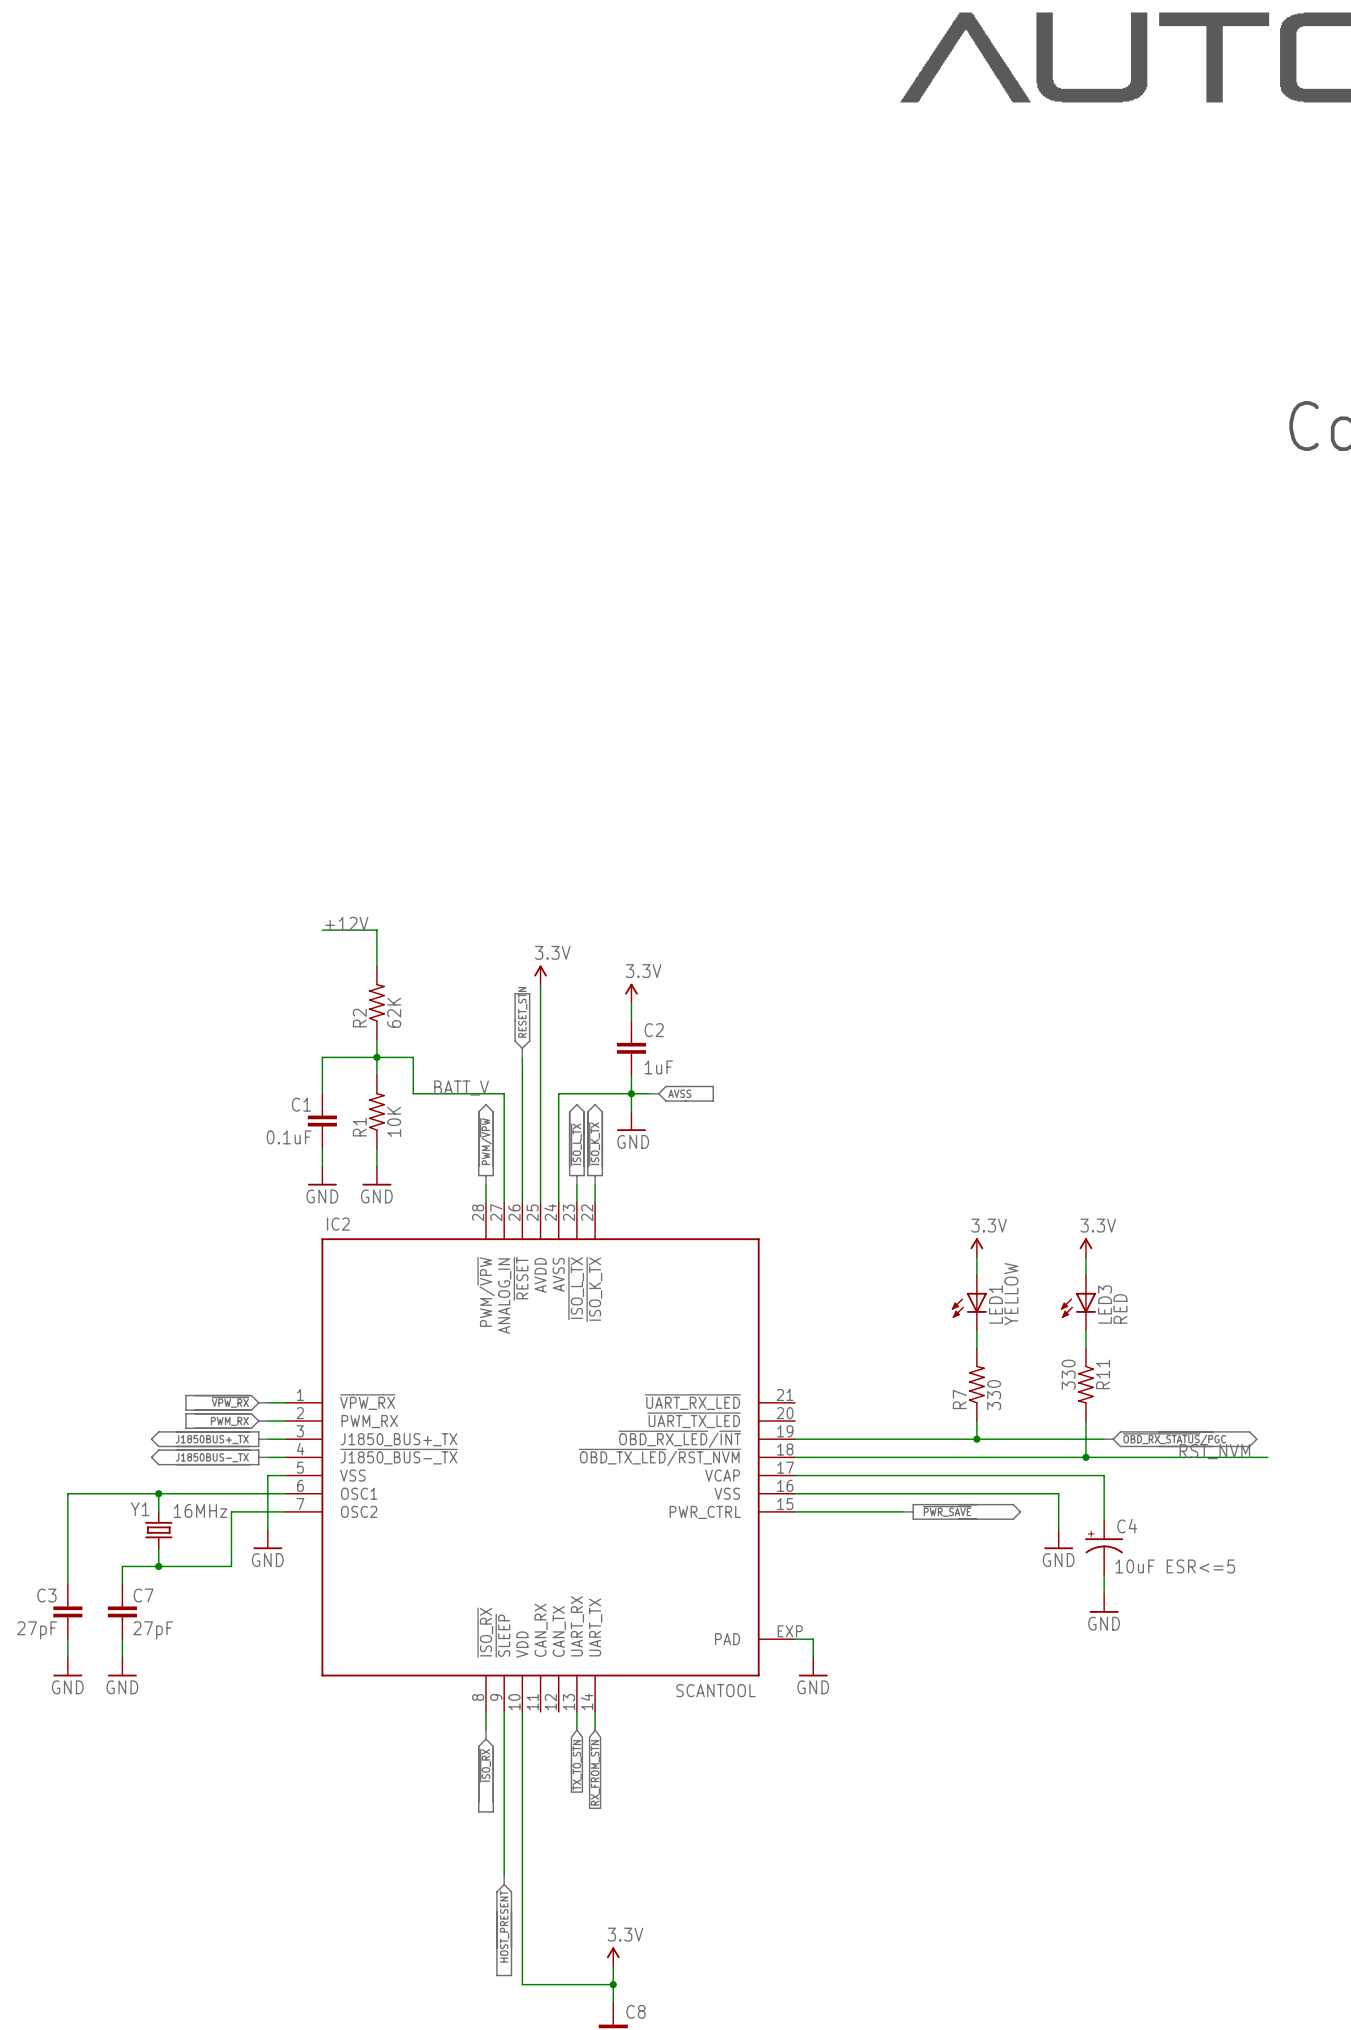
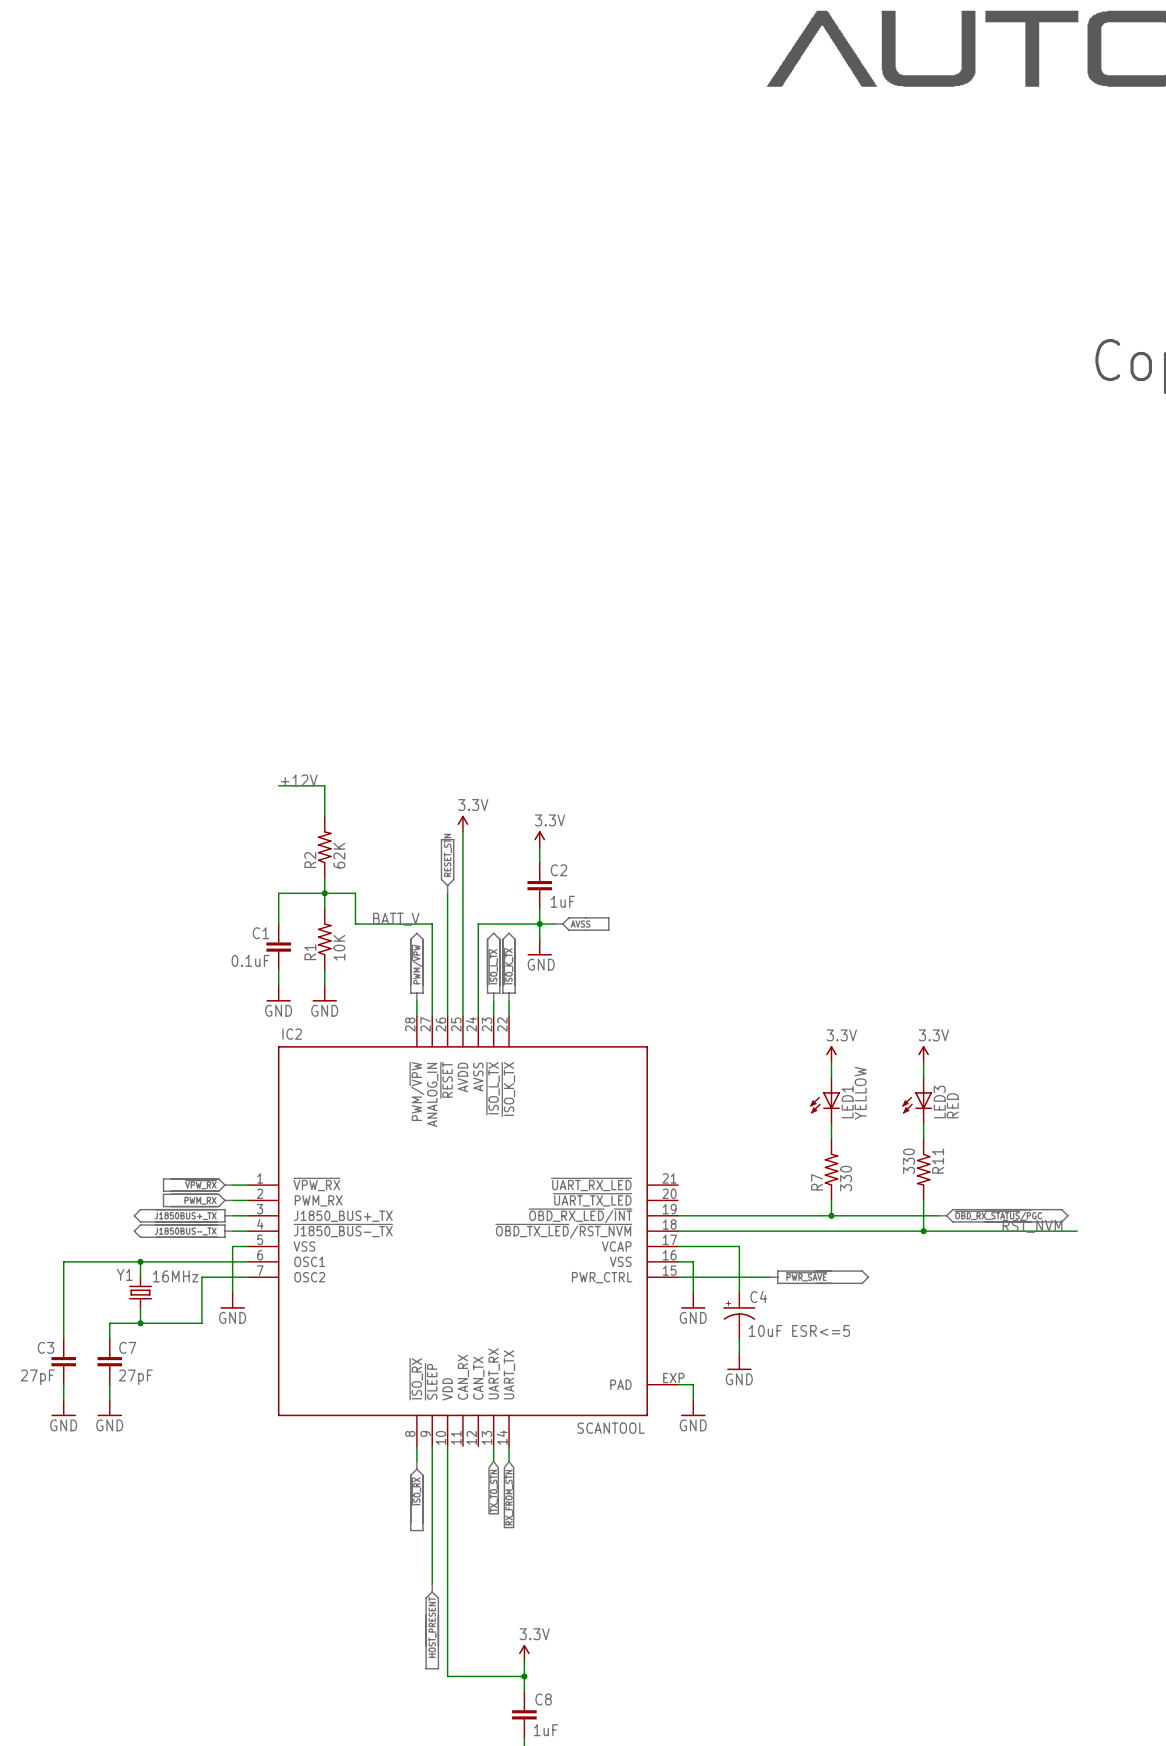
wire: (867, 1475) (1104, 1475) (1104, 1521) -> (739, 1246) (739, 1292)
wire: (813, 1493) (1058, 1493) (1058, 1530) -> (693, 1261) (693, 1292)
power symbol: none -> GND (693, 1300)
power symbol: GND (1058, 1539) -> none
C4 position: (1104, 1548) -> (739, 1315)
wire: (1104, 1575) (1104, 1593) -> none
wire: none -> (739, 1338) (739, 1353)
power symbol: GND (1104, 1603) -> none
power symbol: none -> GND (739, 1362)

